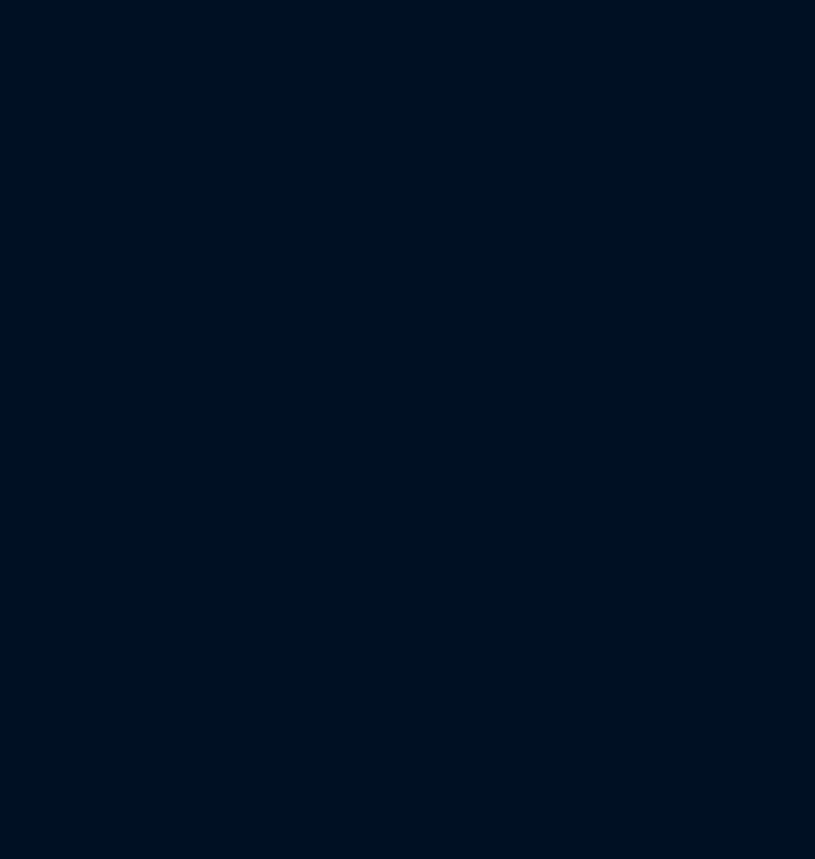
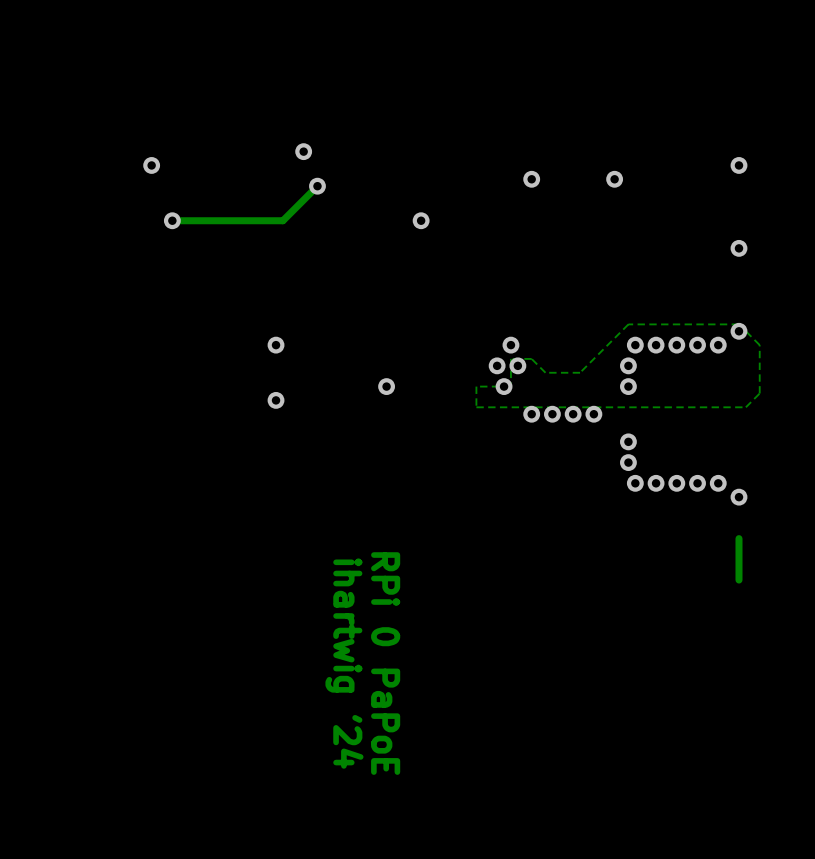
via: none -> (303, 151)
via: none -> (151, 165)
via: none -> (738, 165)
via: none -> (531, 179)
via: none -> (614, 179)
track: none -> (317, 186) (282, 220) (172, 220)
via: none -> (317, 186)
via: none -> (172, 220)
via: none -> (421, 220)
via: none -> (738, 248)
zone outline: none -> (738, 324) (759, 345) (759, 393) (745, 407) (476, 407) (476, 386) (510, 386) (510, 358) (531, 358) (545, 372) (580, 372) (628, 324) (738, 324)
via: none -> (738, 331)
via: none -> (276, 345)
via: none -> (510, 345)
via: none -> (635, 345)
via: none -> (656, 345)
via: none -> (676, 345)
via: none -> (697, 345)
via: none -> (718, 345)
via: none -> (497, 365)
via: none -> (517, 365)
via: none -> (628, 365)
via: none -> (386, 386)
via: none -> (504, 386)
via: none -> (628, 386)
via: none -> (276, 400)
via: none -> (531, 414)
via: none -> (552, 414)
via: none -> (573, 414)
via: none -> (593, 414)
via: none -> (628, 441)
via: none -> (628, 462)
via: none -> (635, 483)
via: none -> (656, 483)
via: none -> (676, 483)
via: none -> (697, 483)
via: none -> (718, 483)
via: none -> (738, 497)
track: none -> (738, 538) (738, 580)
text: none -> ihartwig '24 (344, 663)
text: none -> RPi 0 PaPoE (385, 663)

